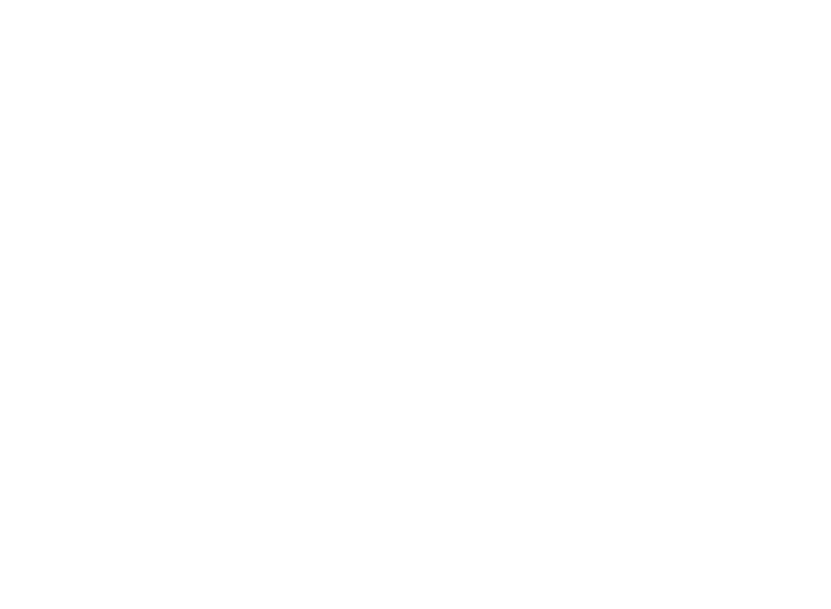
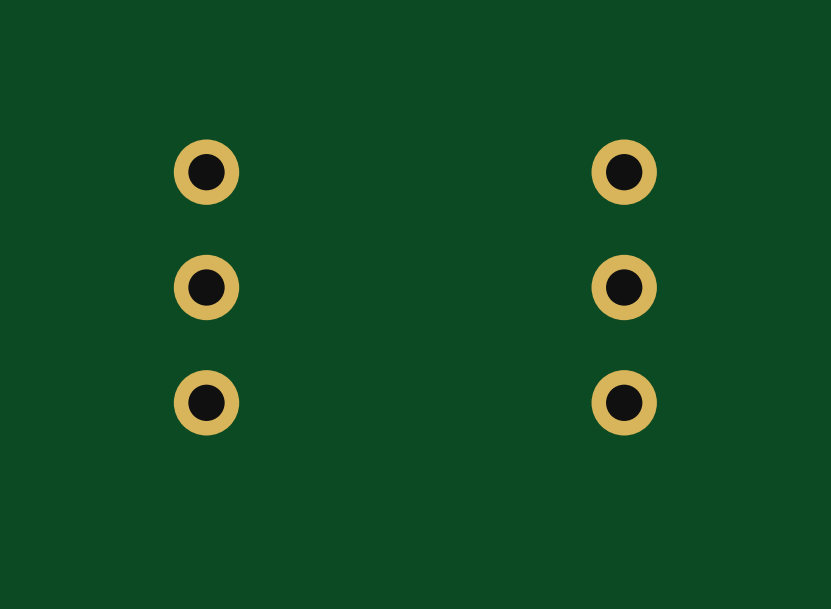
part: none -> (206, 287)
part: none -> (624, 287)

